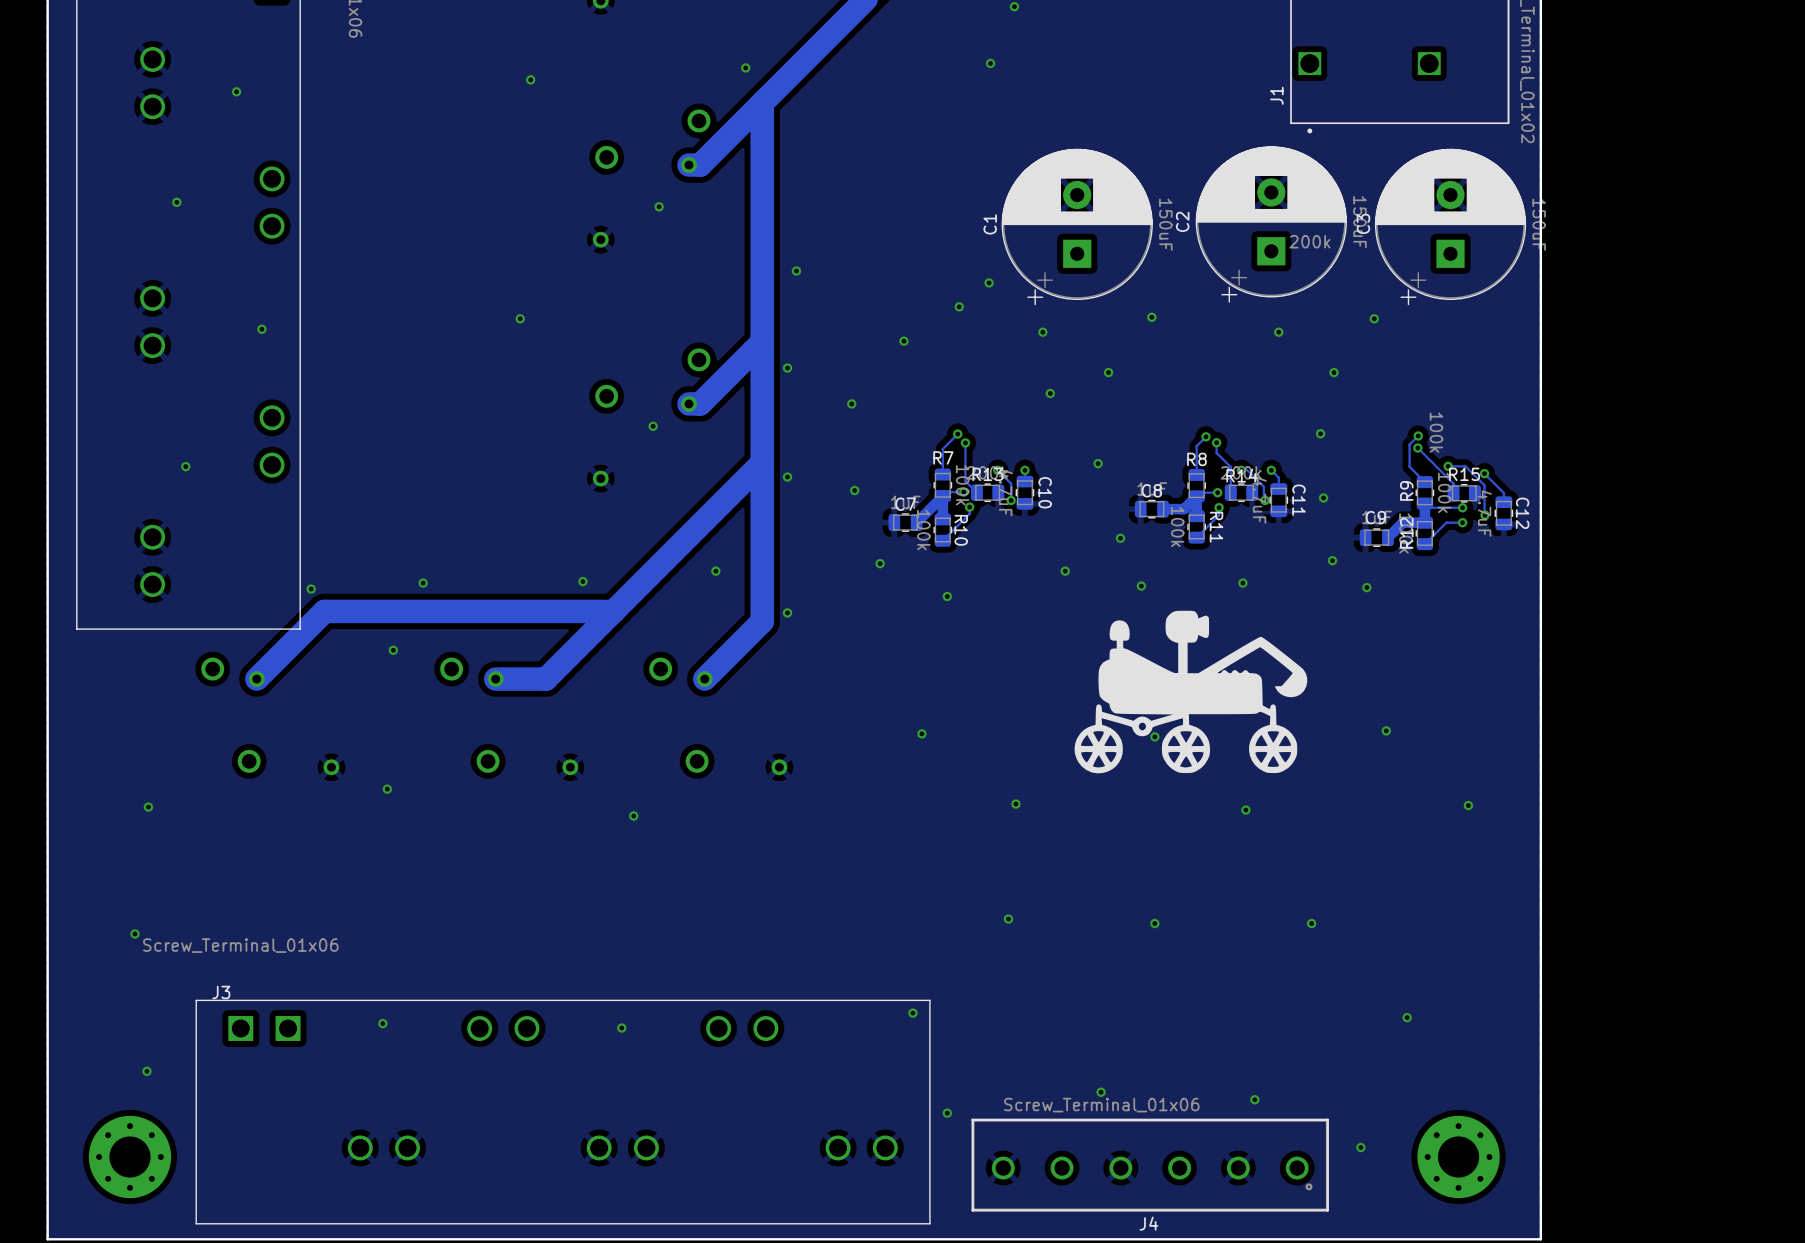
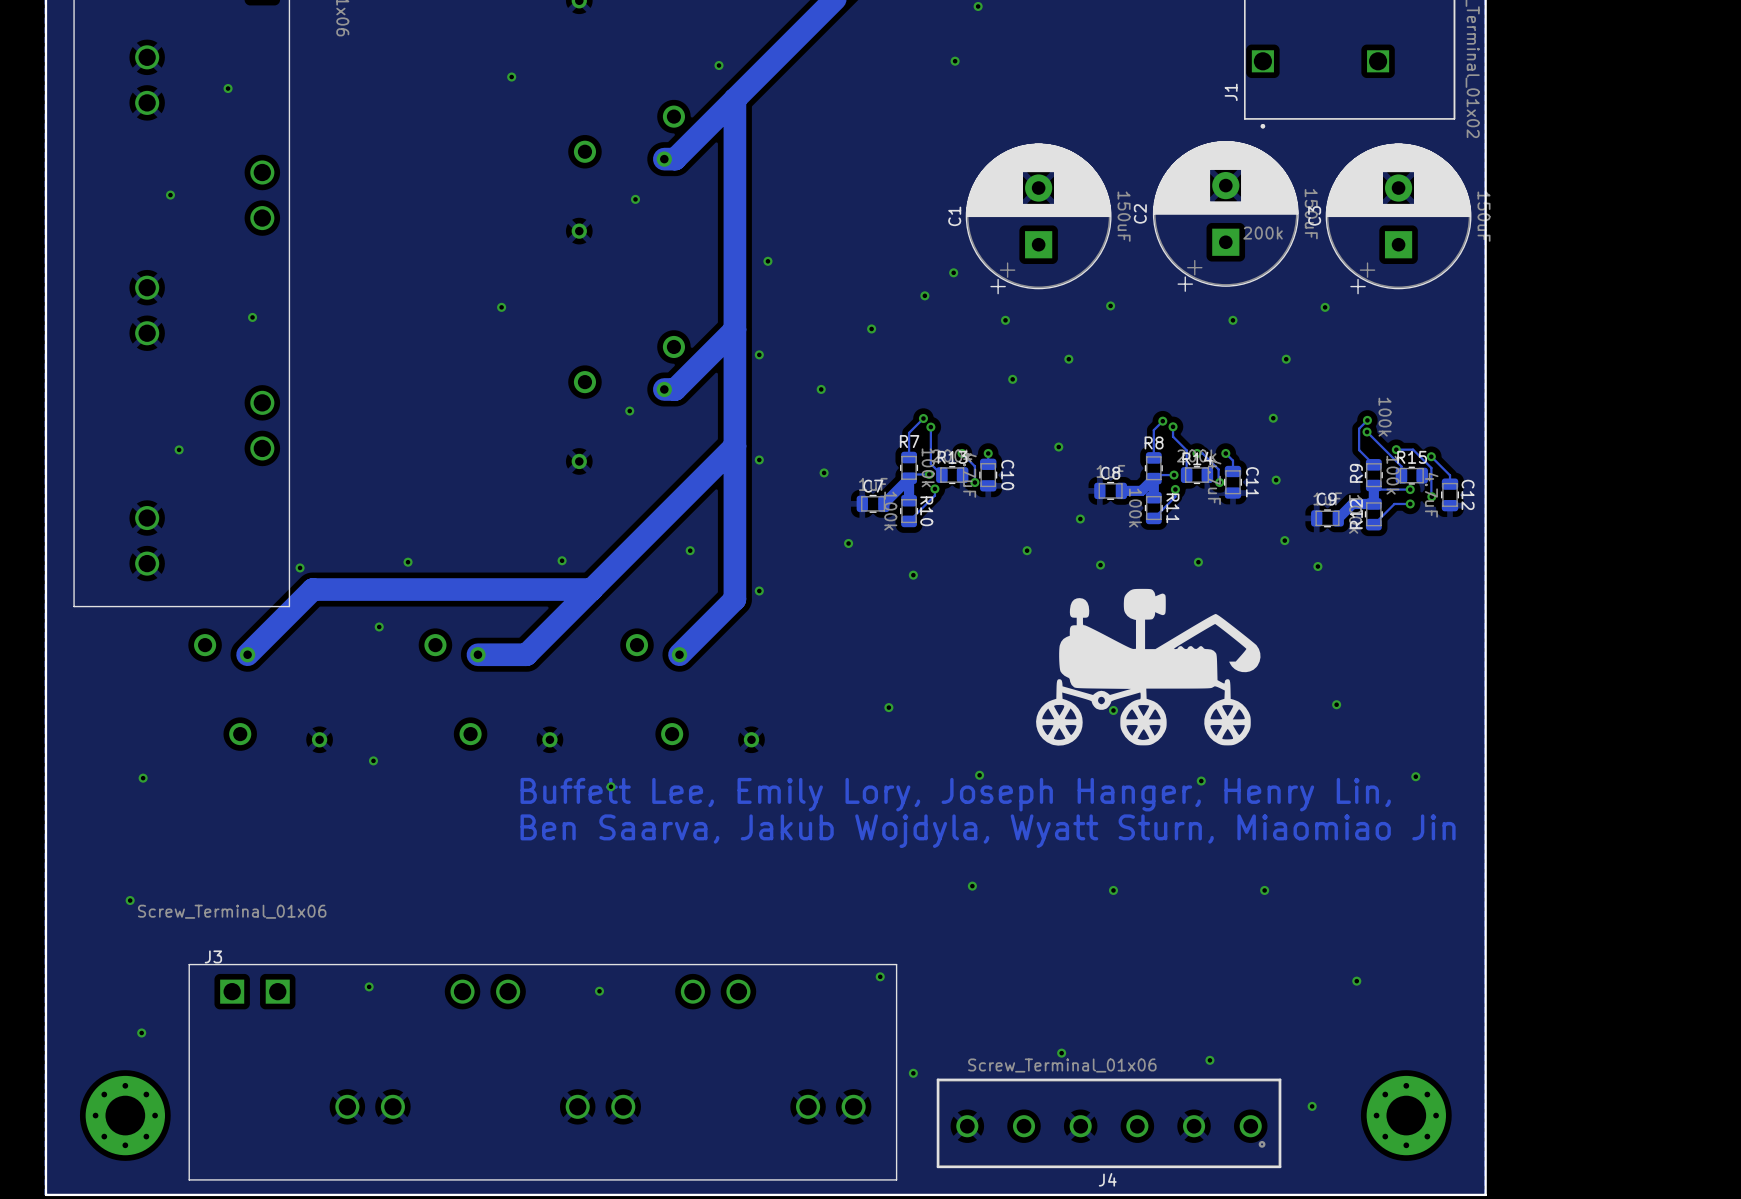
text: none -> Buffett Lee, Emily Lory, Joseph Hanger, Henry Lin, (955, 794)
text: none -> Ben Saarva, Jakub Wojdyla, Wyatt Sturn, Miaomiao Jin (988, 831)

